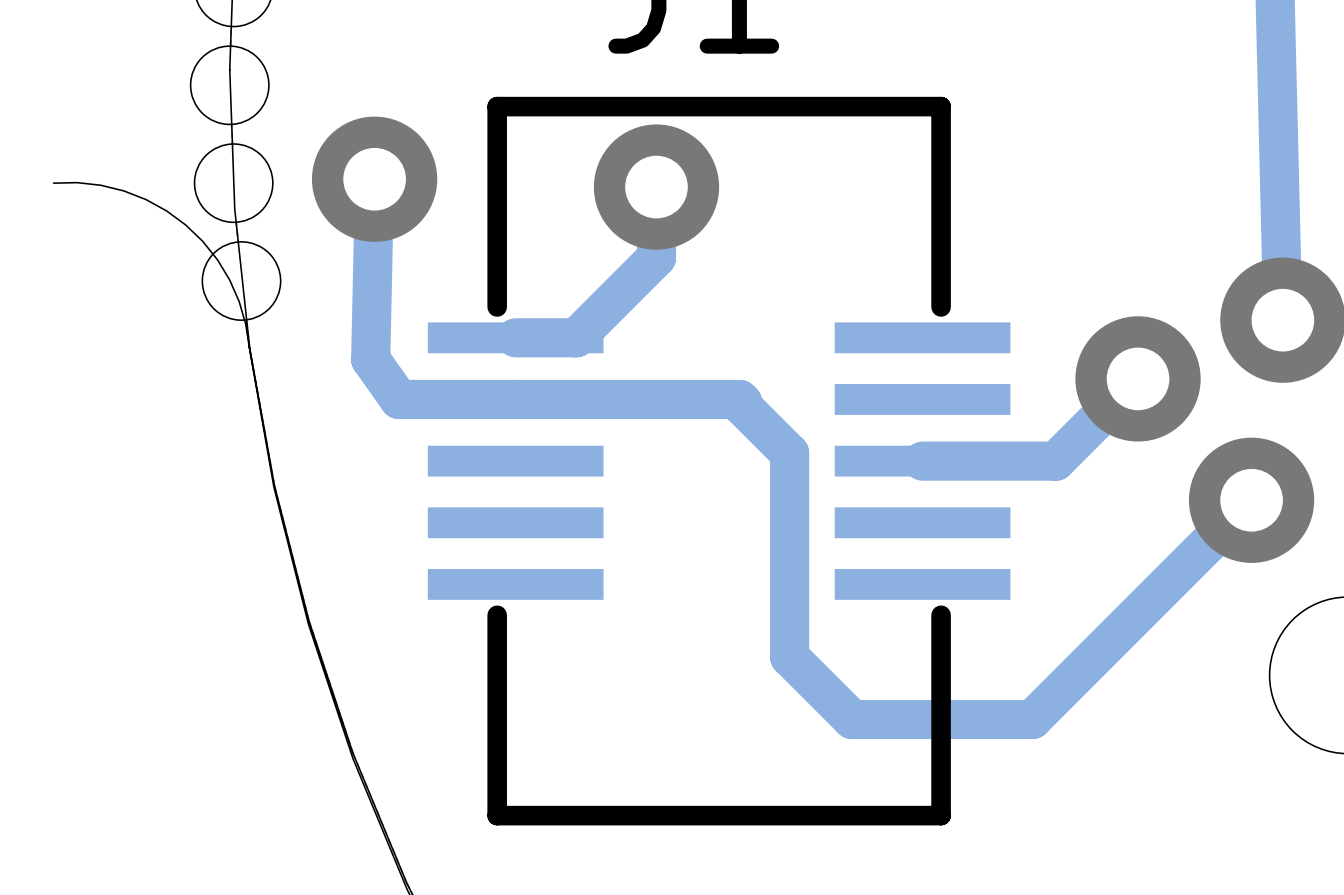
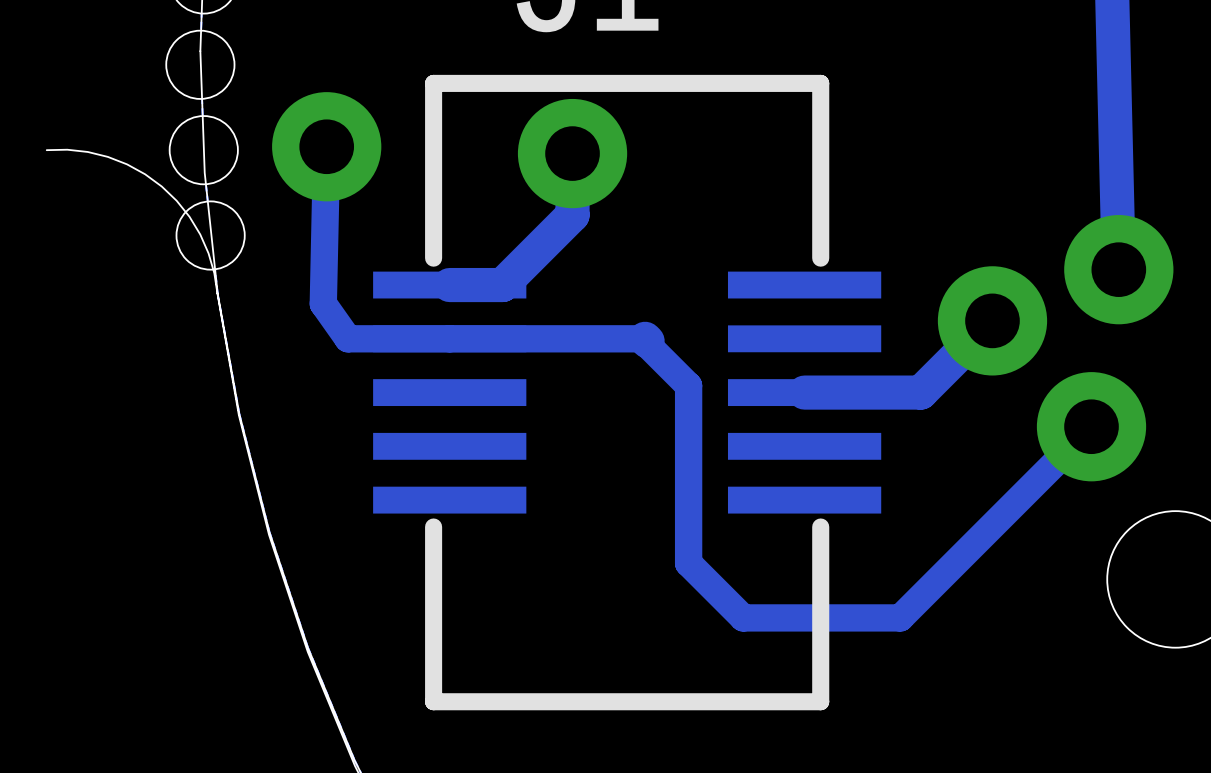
track width: thick (374, 179) (370, 359) (399, 399) (739, 399) -> thin (326, 146) (323, 303) (348, 338) (645, 338)
track width: thick (742, 402) (742, 406) (789, 453) (789, 656) (852, 719) (1032, 719) (1251, 500) -> thin (647, 341) (647, 344) (688, 385) (688, 563) (743, 617) (900, 617) (1091, 426)

